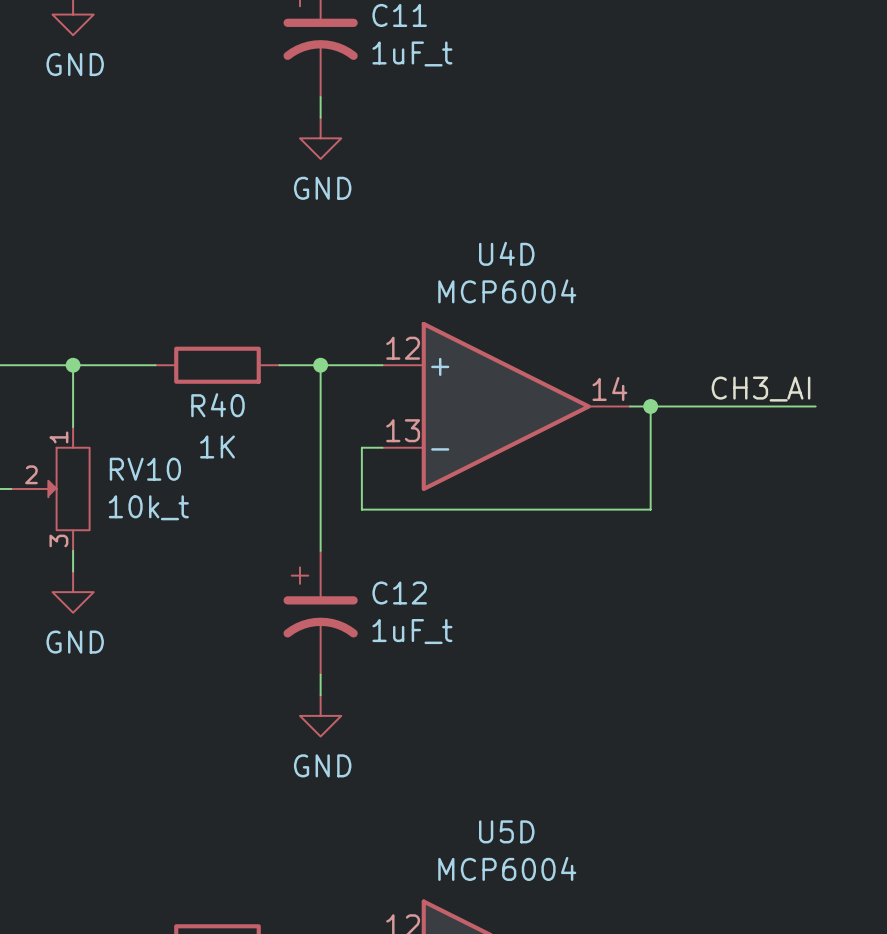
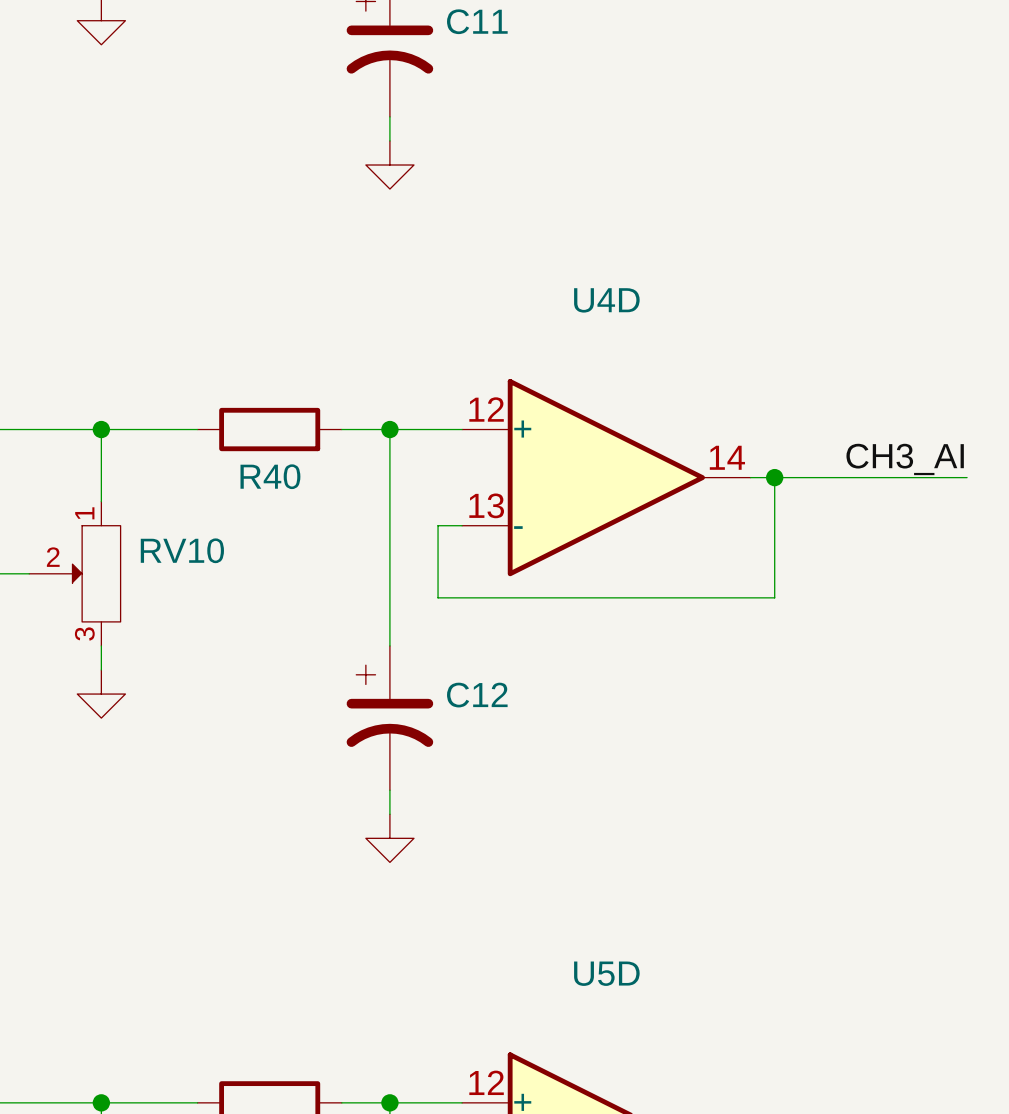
C11 value: 1uF_t (412, 53) -> none
power symbol text: GND (75, 64) -> none
power symbol text: GND (322, 188) -> none
U4D value: MCP6004 (507, 291) -> none
R40 value: 1K (217, 446) -> none
RV10 value: 10k_t (148, 507) -> none
C12 value: 1uF_t (412, 631) -> none
power symbol text: GND (75, 642) -> none
power symbol text: GND (322, 765) -> none
U5D value: MCP6004 (507, 868) -> none

